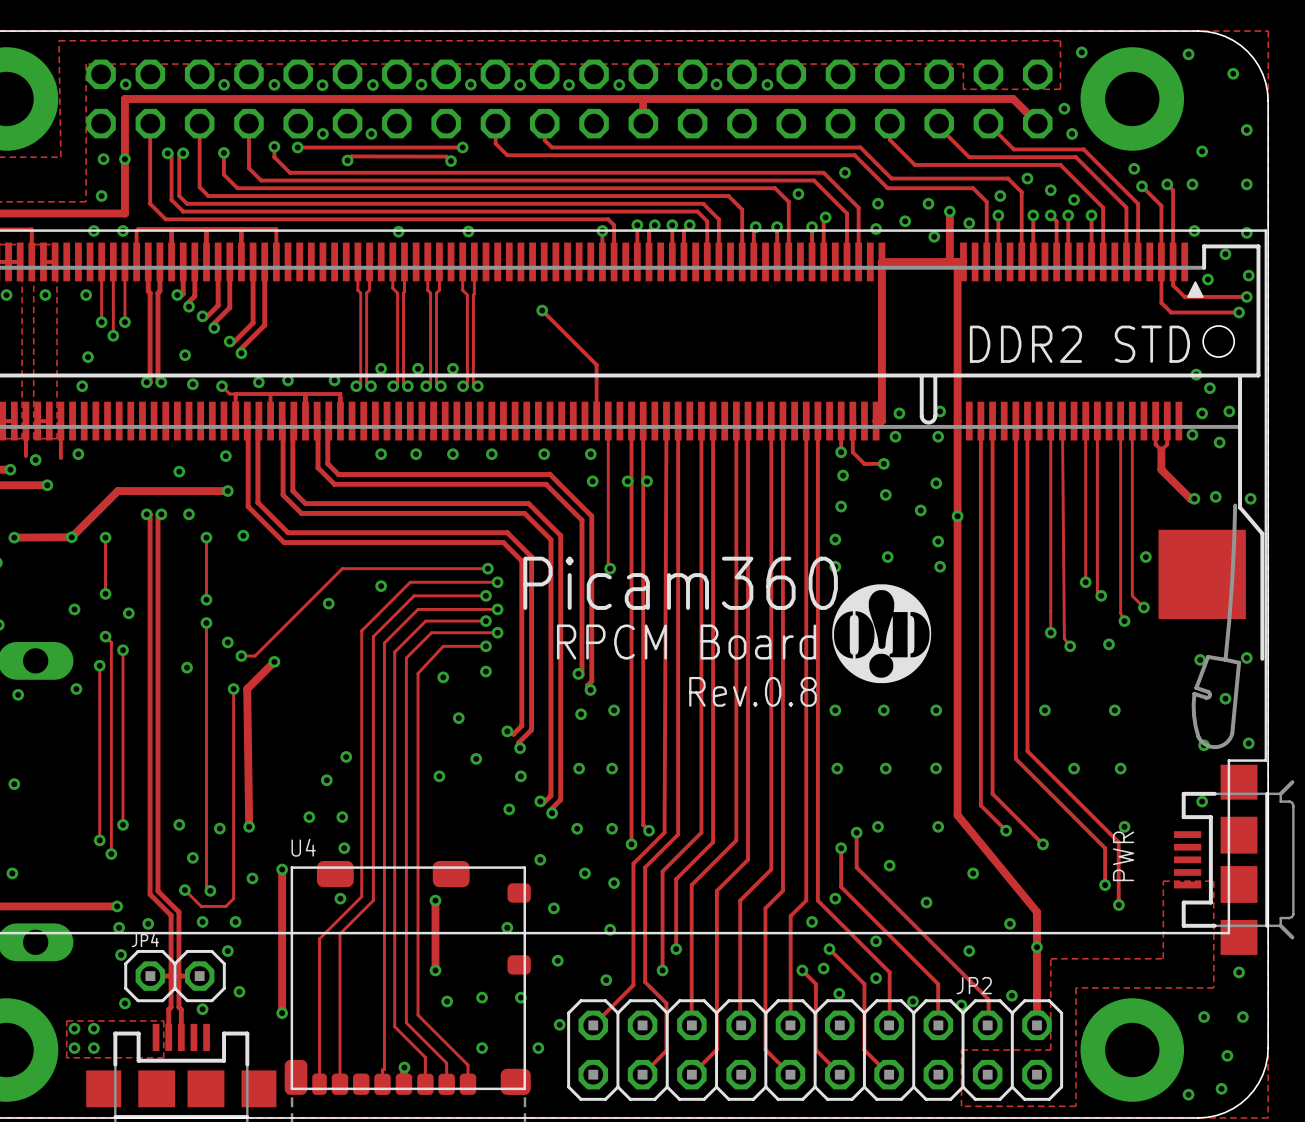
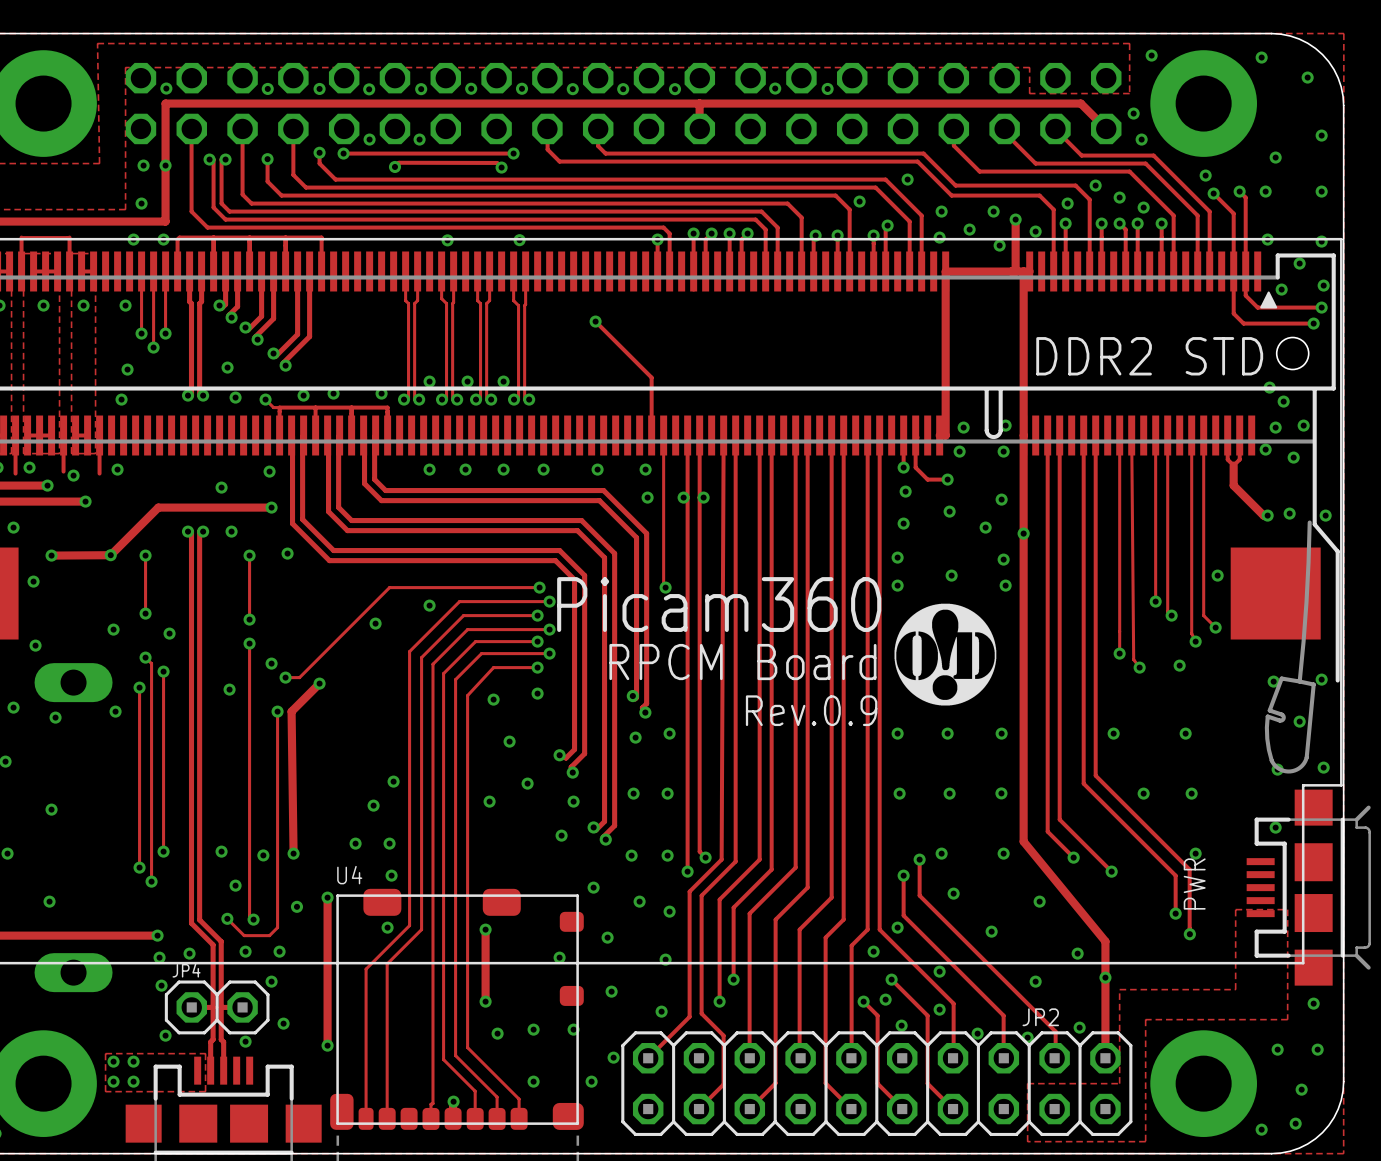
text position: Picam360 (680, 583) -> Picam360 (719, 604)
text position: RPCM Board (686, 642) -> RPCM Board (742, 662)
text: Rev.0.8 (753, 691) -> Rev.0.9 (811, 710)

